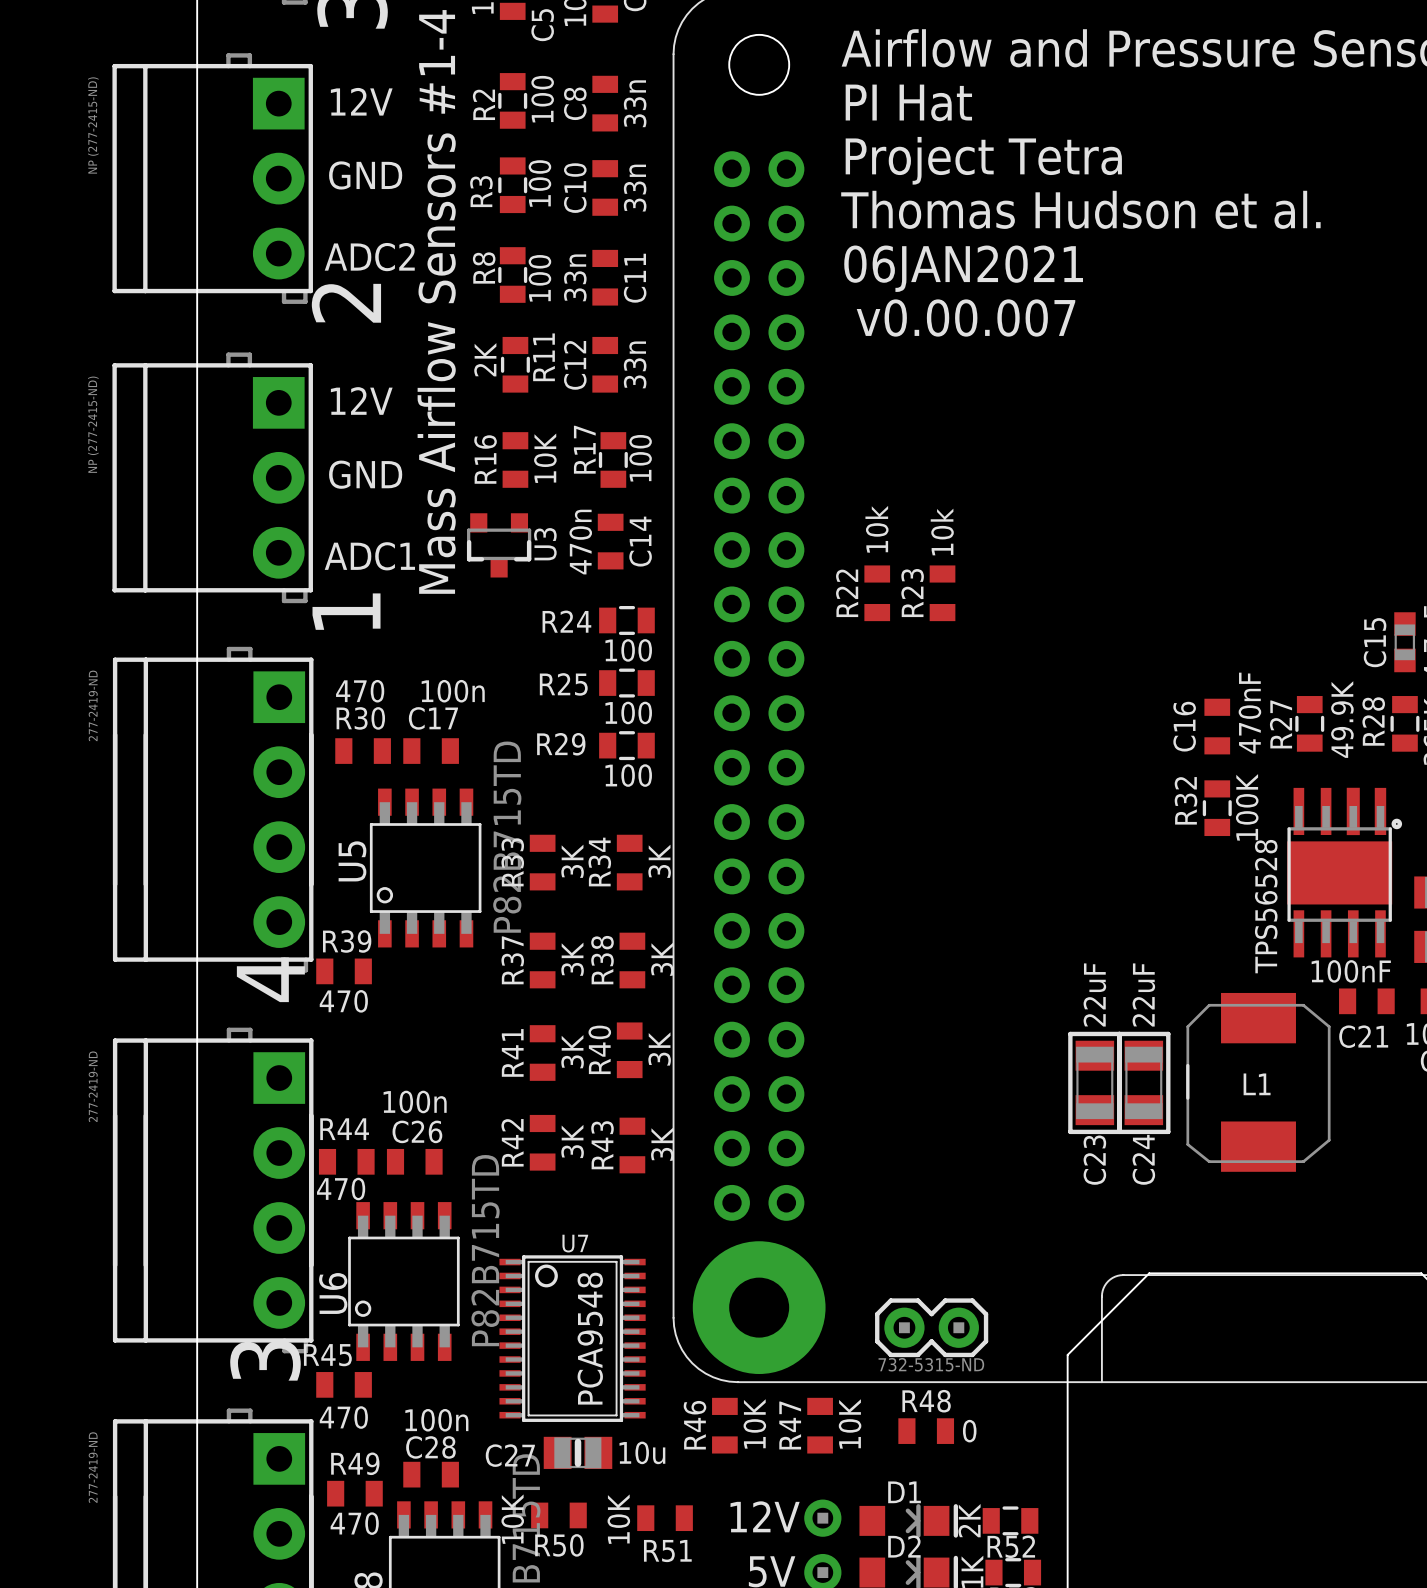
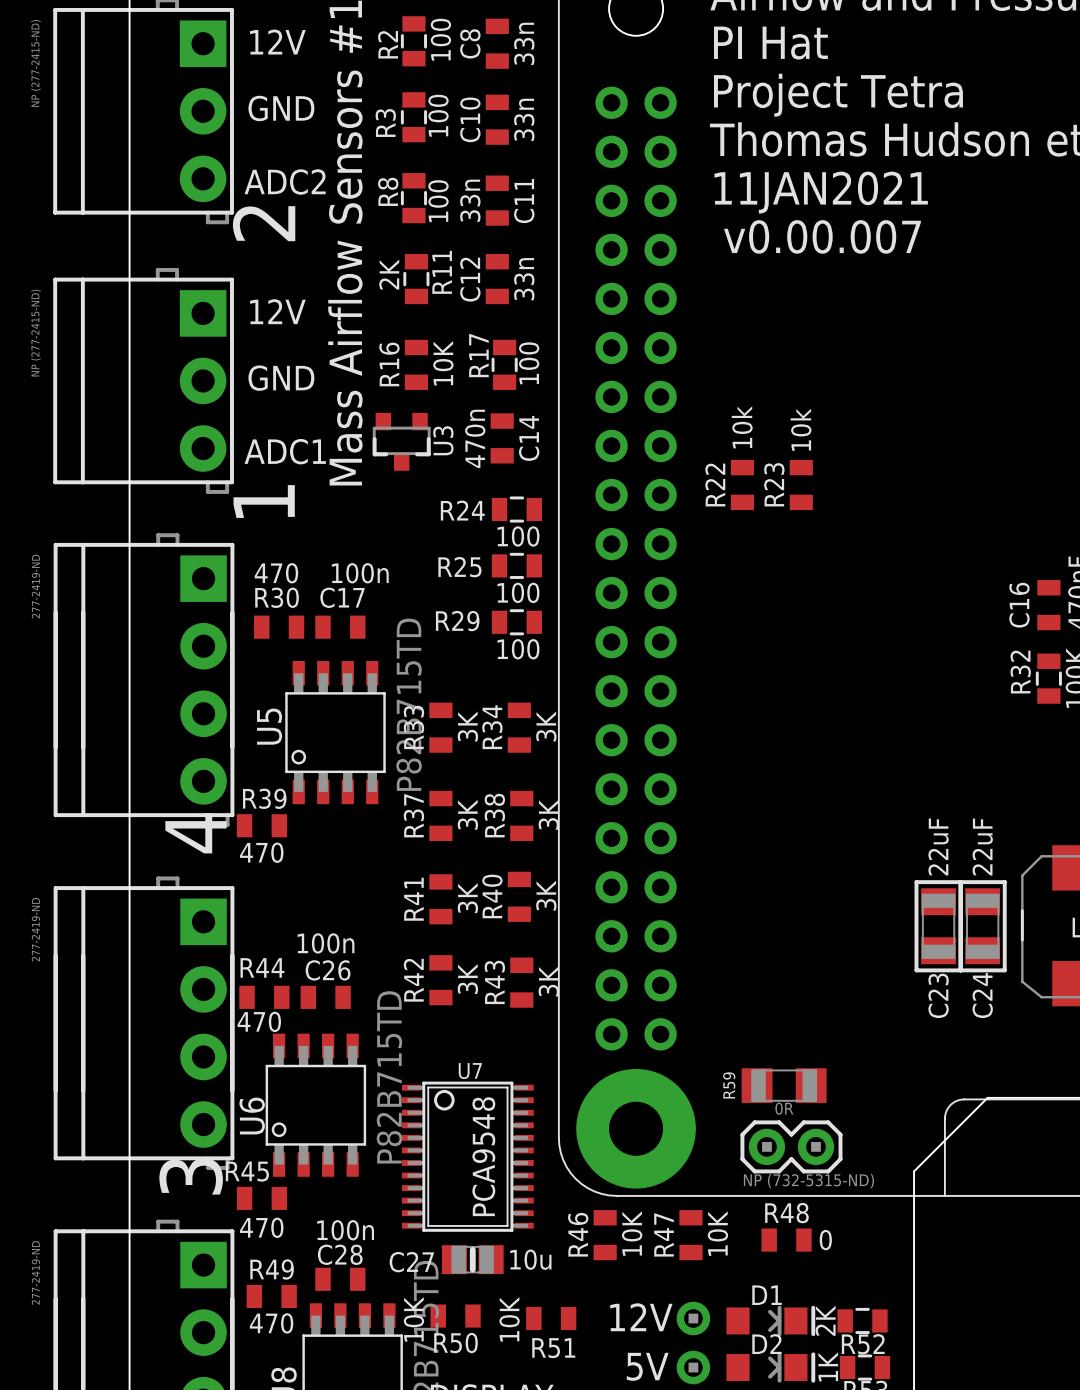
text: 06JAN2021 (963, 268) -> 11JAN2021 (821, 192)
R59: none -> 0R (784, 1085)
part value: 732-5315-ND (931, 1364) -> NP (732-5315-ND) (808, 1181)

